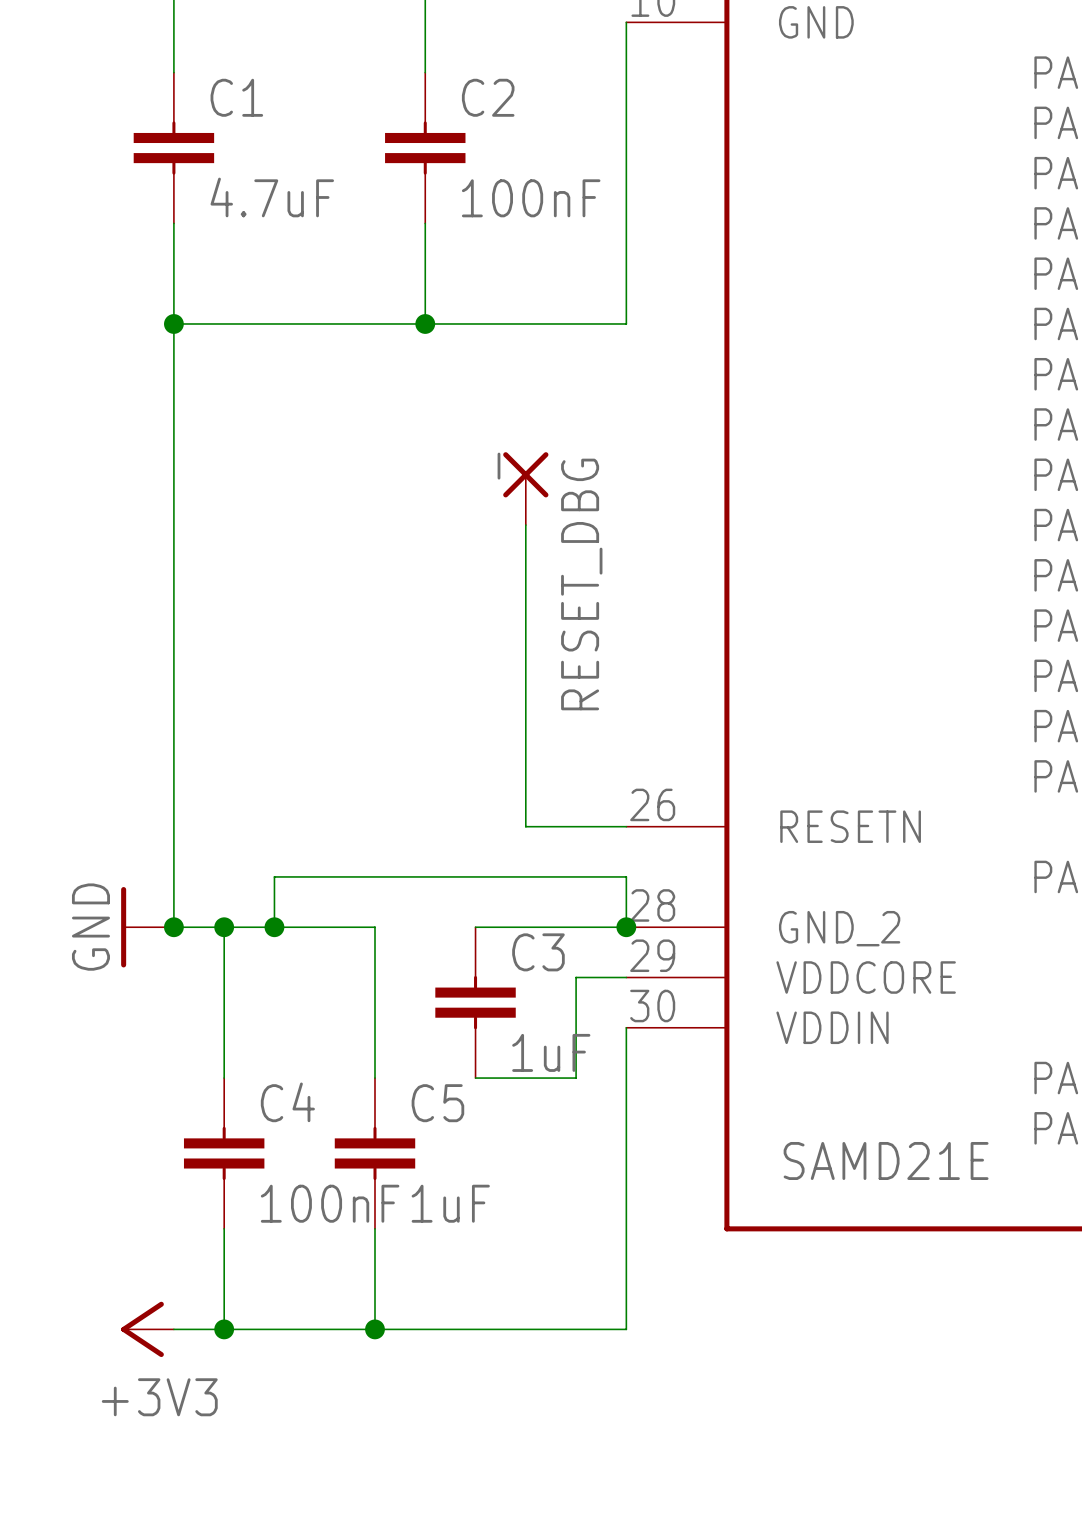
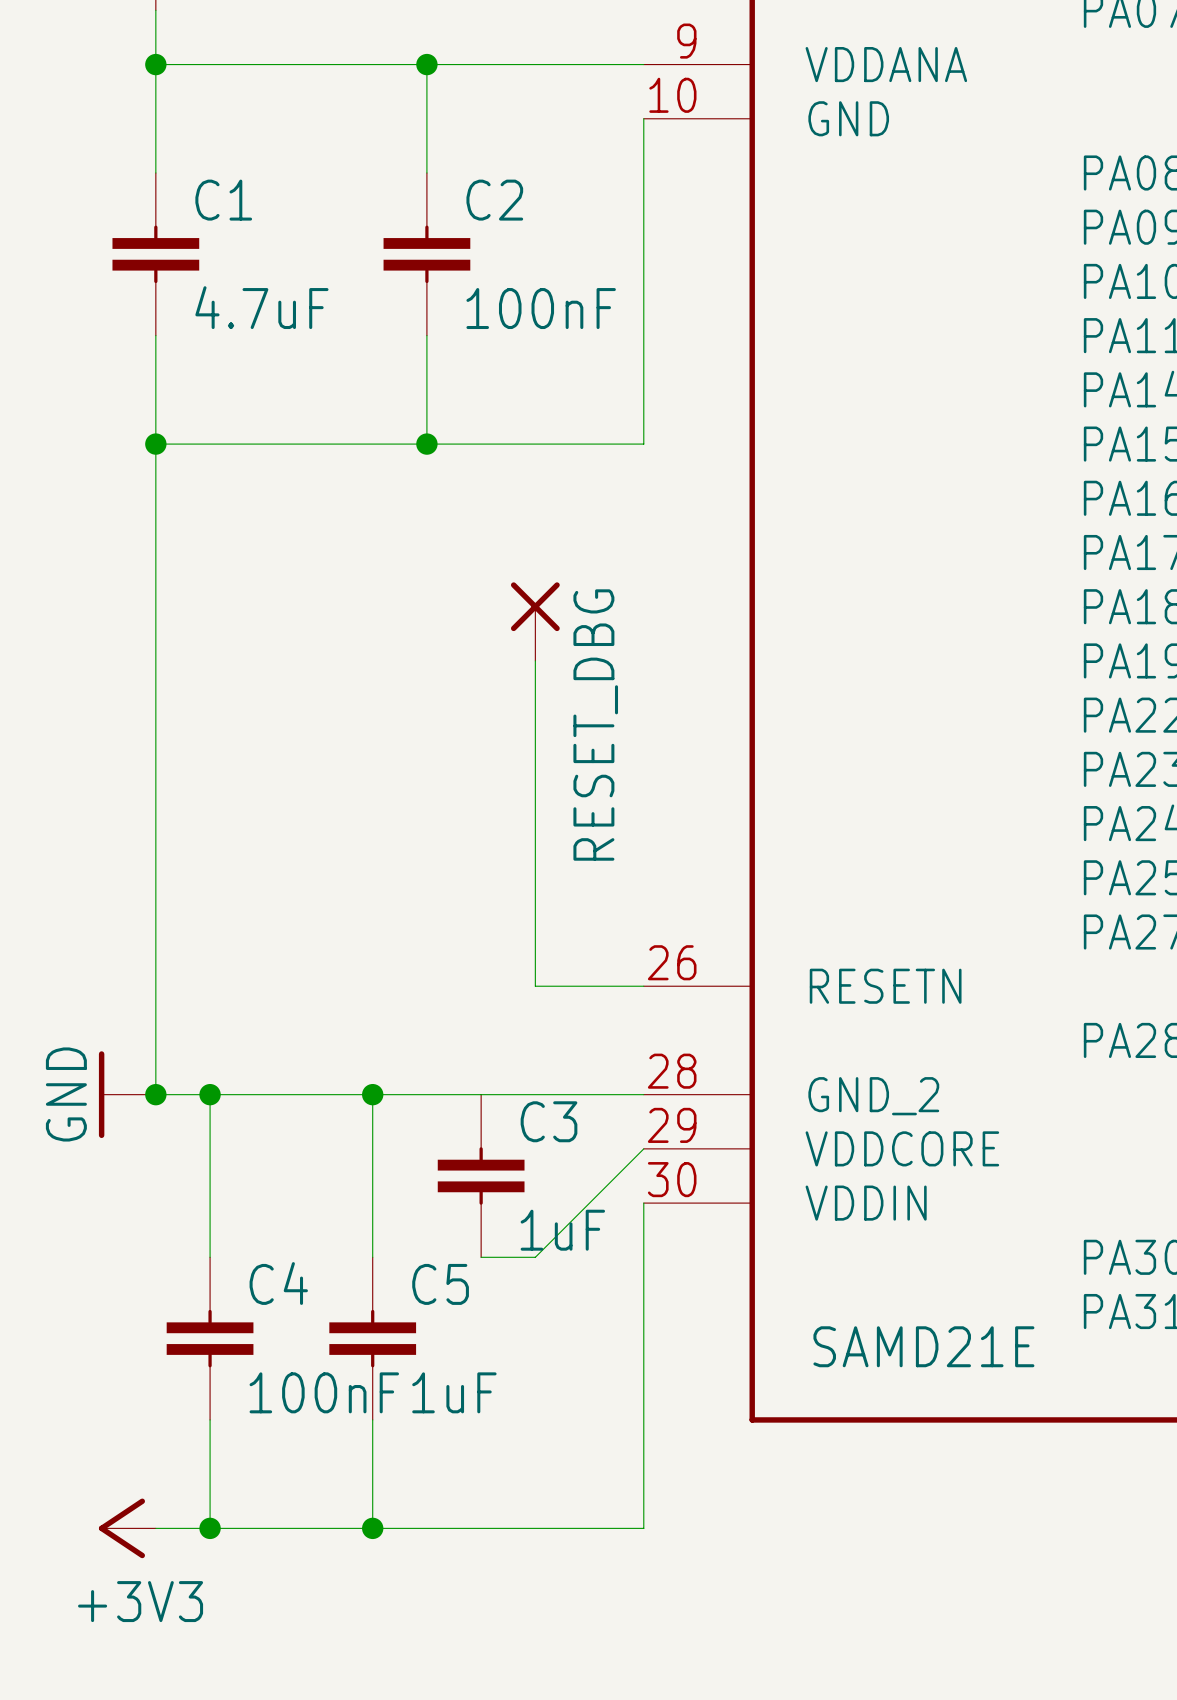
RESET_DBG value: _ (498, 466) -> none
wire: (274, 927) (274, 876) (626, 876) (626, 927) -> none
junction position: (274, 927) -> (372, 1094)
wire: none -> (372, 1094) (481, 1094)
junction: (626, 927) -> none
wire: (626, 977) (576, 977) (576, 1078) (525, 1078) -> (643, 1148) (535, 1257)

